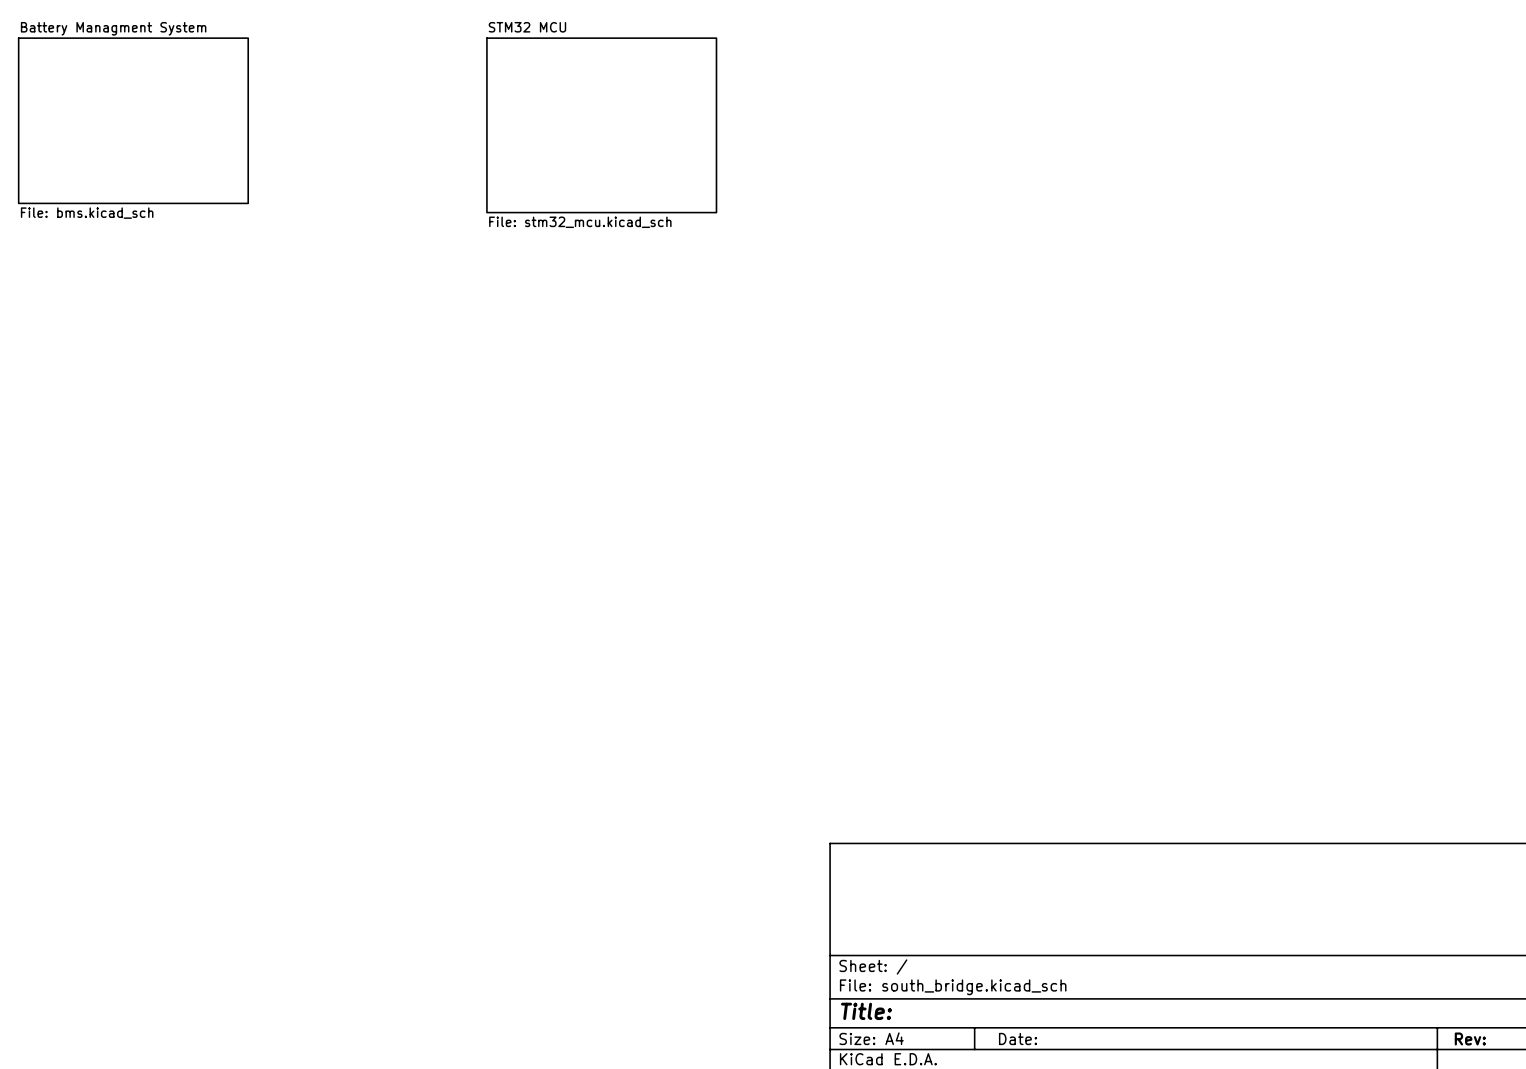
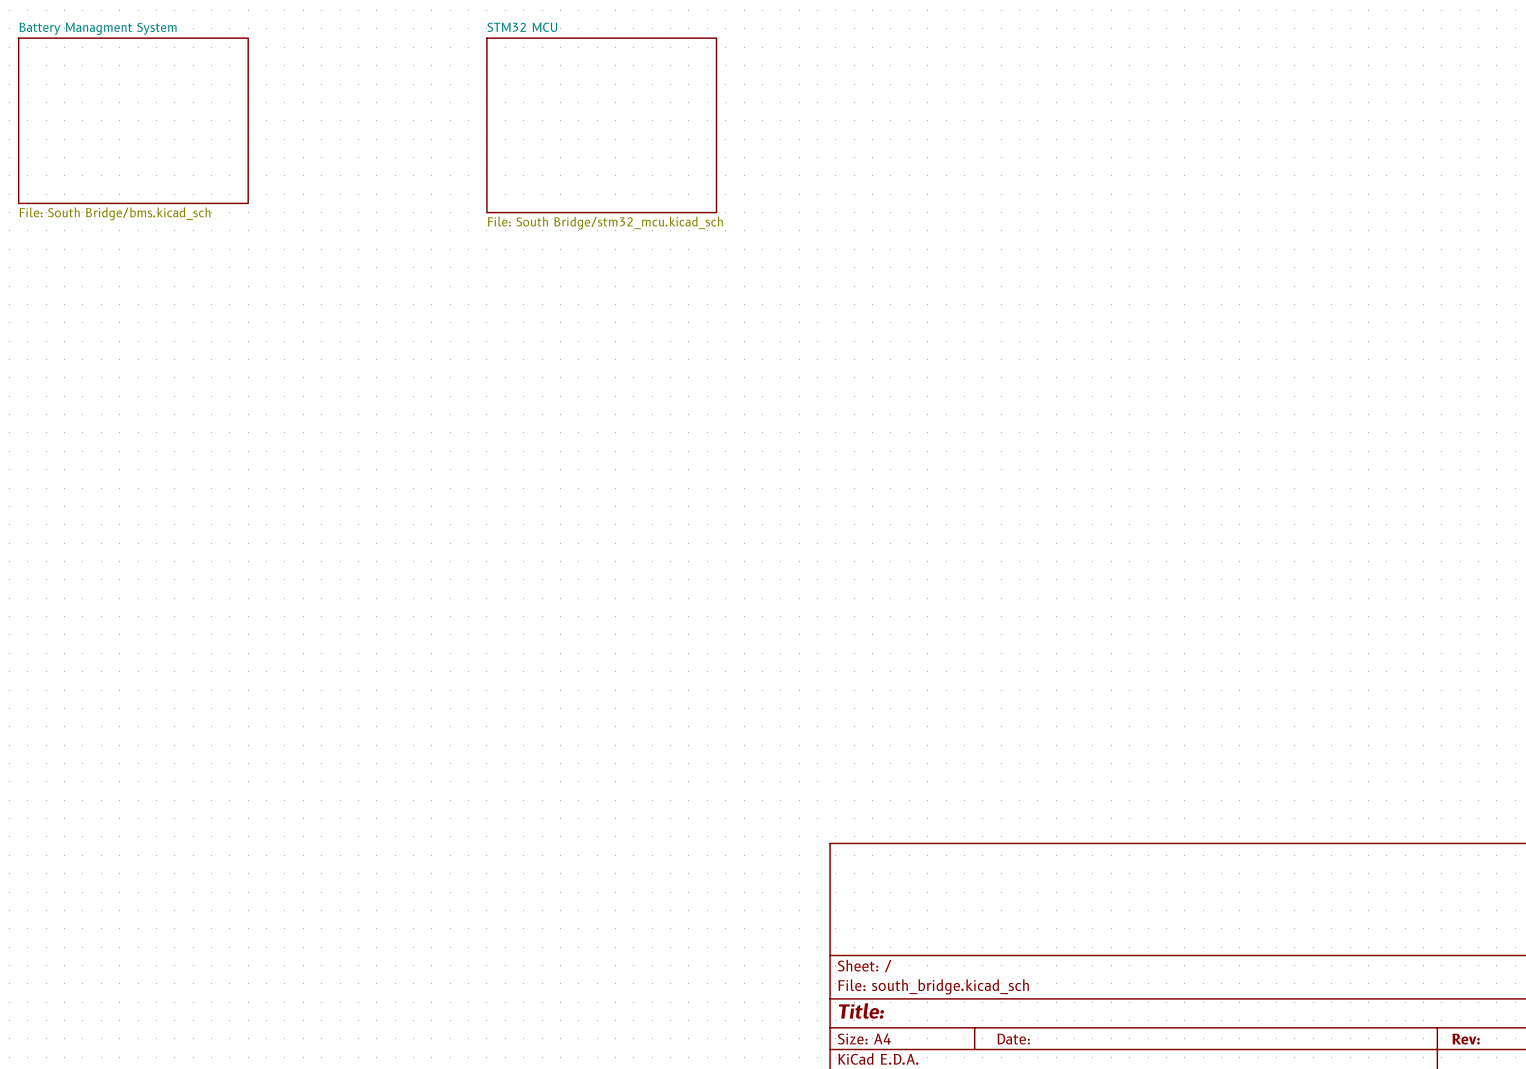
sheet Battery Managment System value: File: bms.kicad_sch (87, 213) -> File: South Bridge/bms.kicad_sch (115, 213)
sheet STM32 MCU value: File: stm32_mcu.kicad_sch (580, 222) -> File: South Bridge/stm32_mcu.kicad_sch (605, 223)

